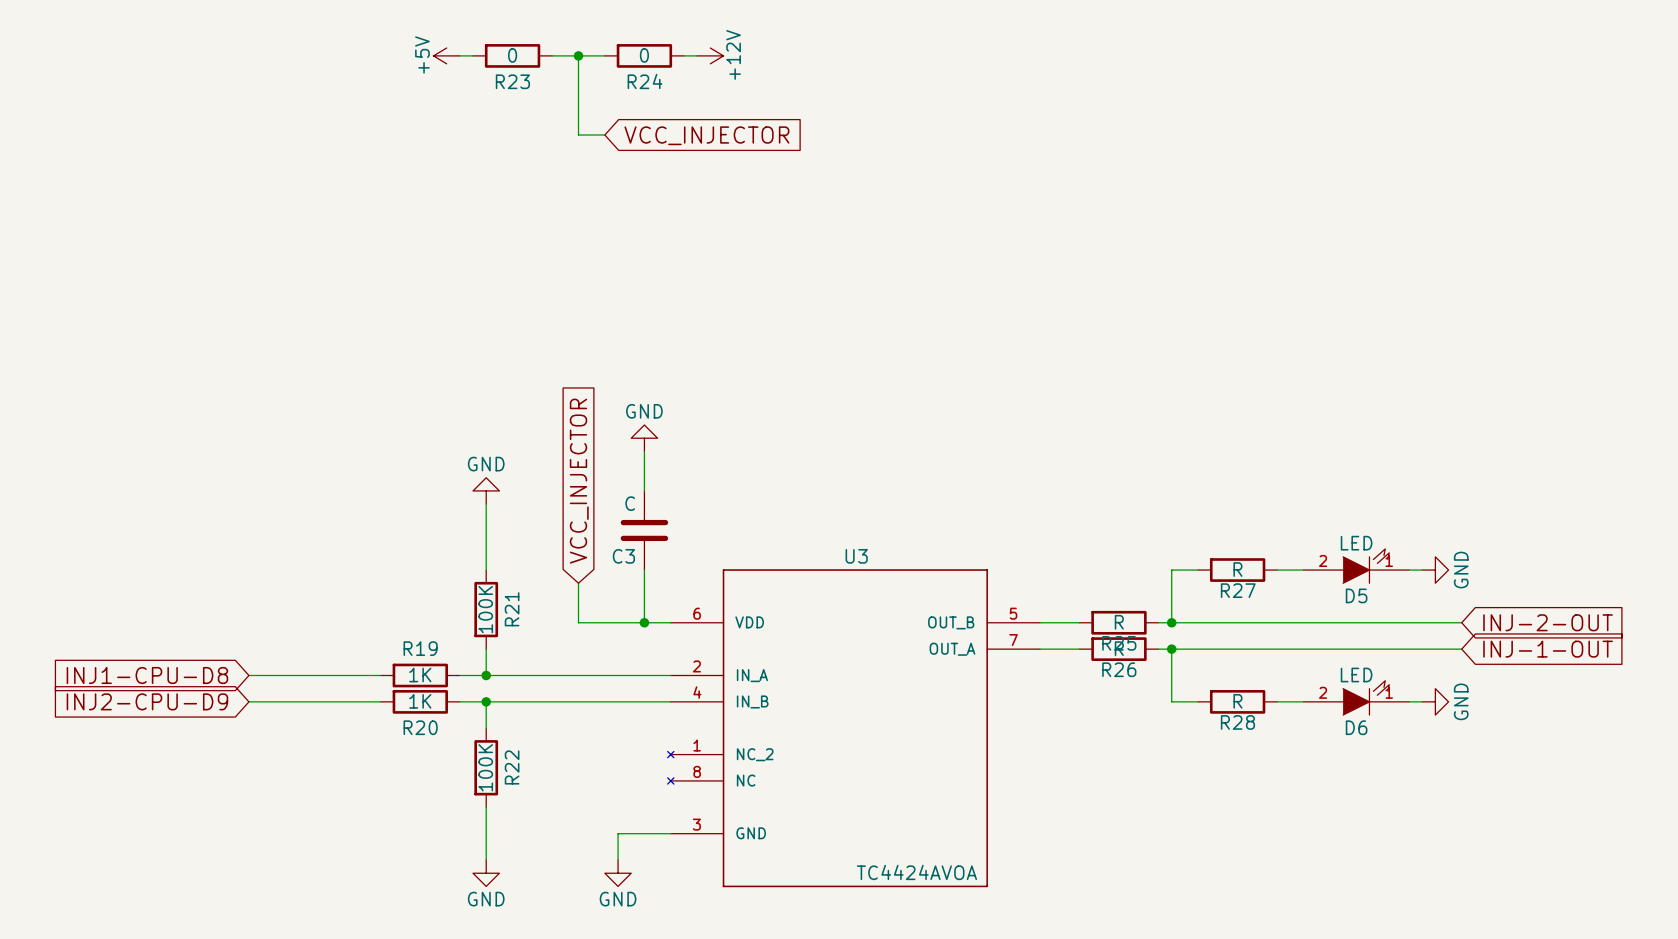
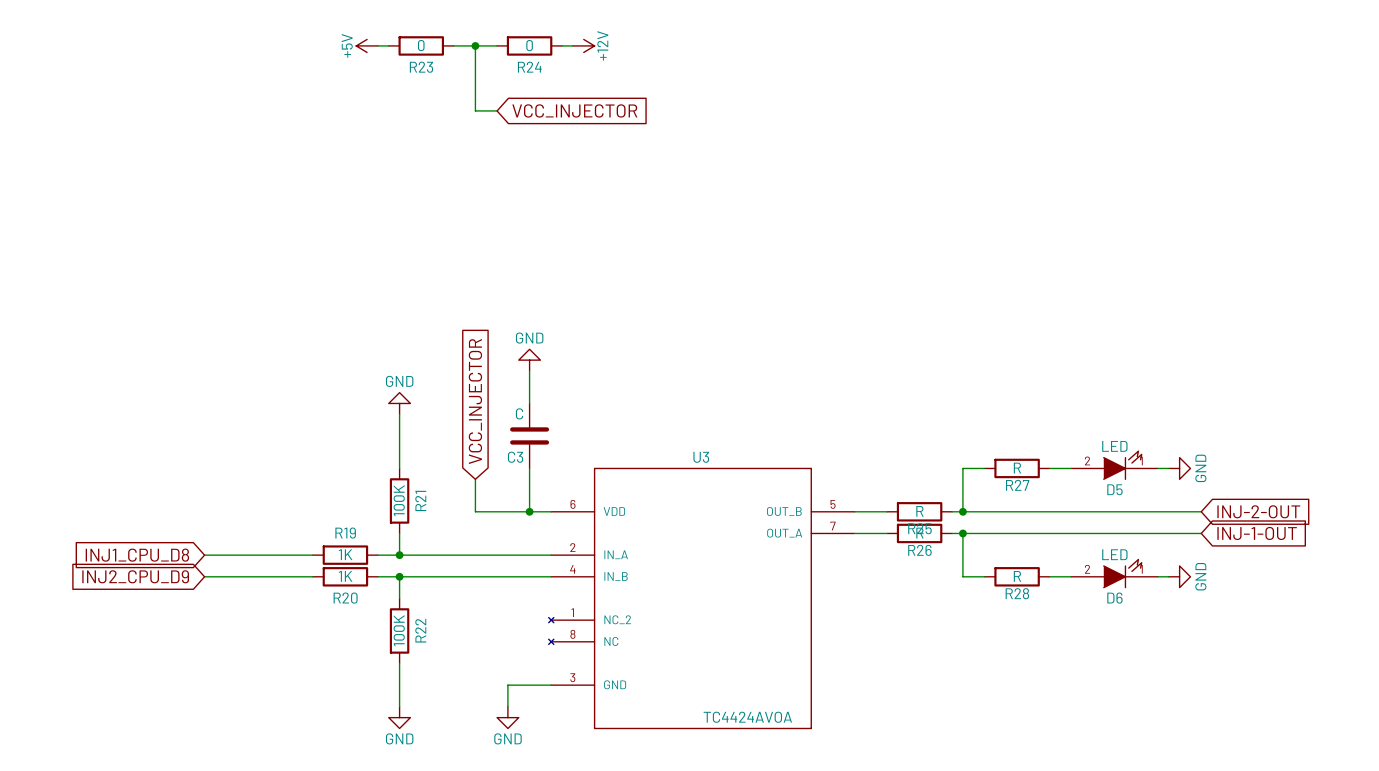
global label: INJ1-CPU-D8 (147, 675) -> INJ1_CPU_D8 (137, 555)
global label: INJ2-CPU-D9 (147, 701) -> INJ2_CPU_D9 (135, 576)

